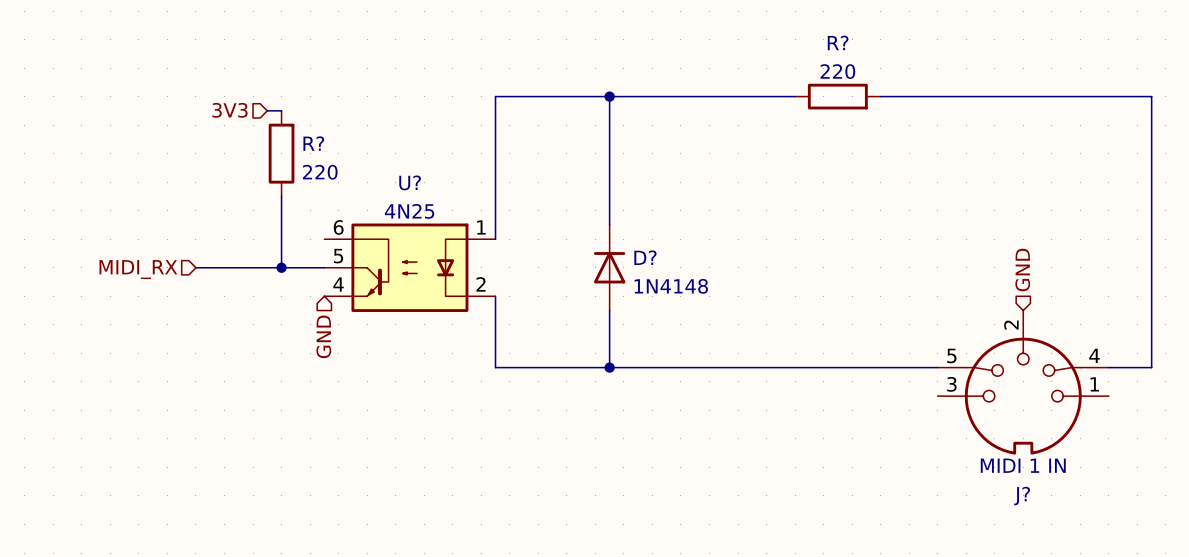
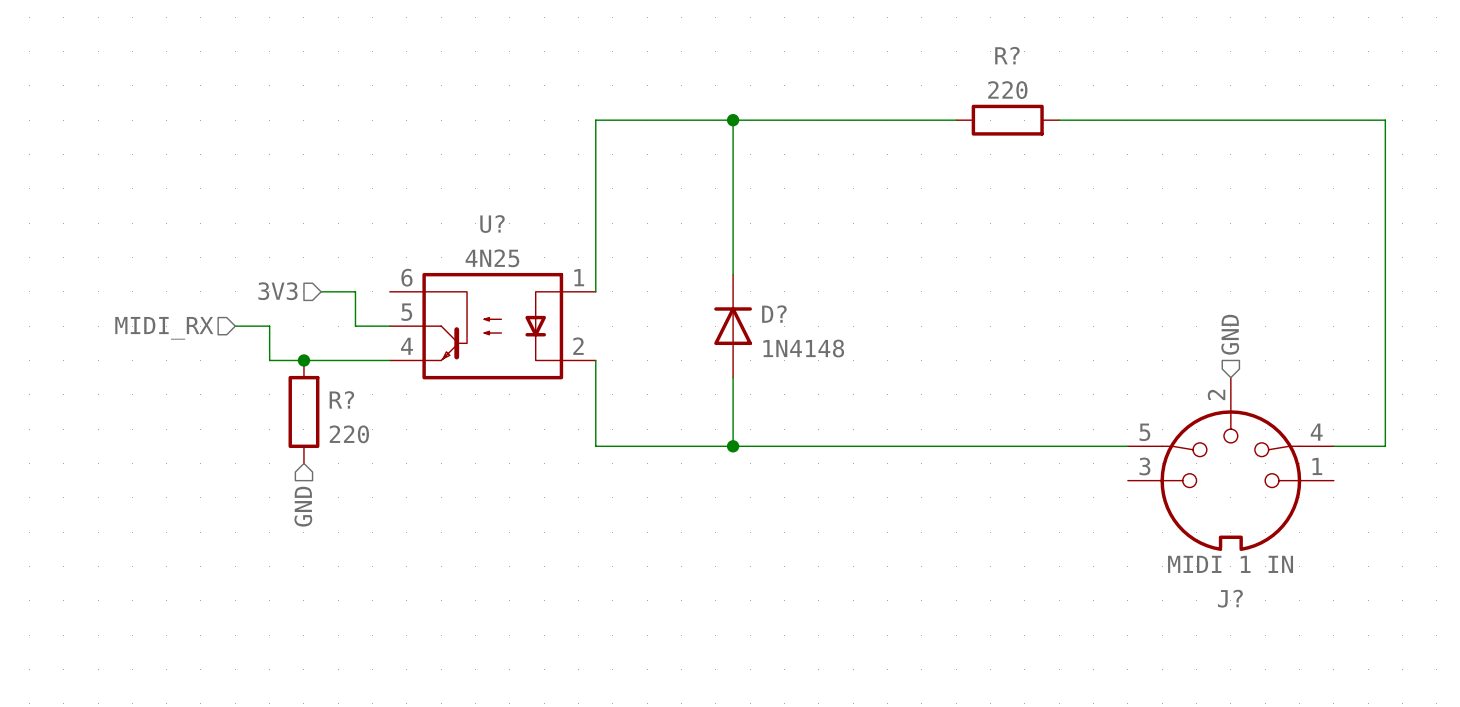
hierarchical label position: 3V3 (229, 110) -> 3V3 (277, 291)
wire: (267, 110) (281, 110) -> none
R? position: (281, 153) -> (303, 411)
wire: (281, 196) (281, 267) -> none
wire: none -> (321, 291) (355, 291) (355, 326)
wire: (224, 267) (295, 267) -> (269, 326) (269, 360) (389, 360)
junction position: (281, 267) -> (303, 360)
hierarchical label position: GND (323, 336) -> GND (303, 506)

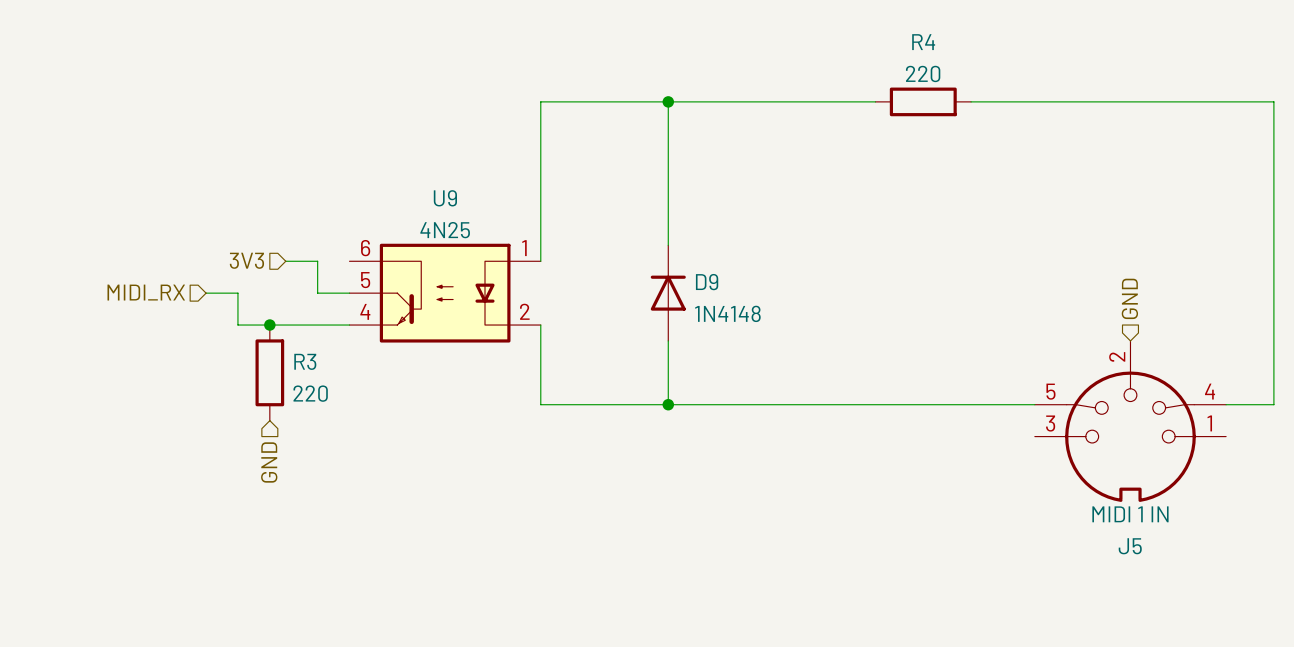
R? name: R? (1007, 55) -> R4 (923, 42)
U? name: U? (492, 224) -> U9 (445, 198)
D? name: D? (774, 314) -> D9 (707, 282)
R? name: R? (341, 399) -> R3 (305, 361)
J?: MIDI 1 IN (1230, 464) -> none
J5: none -> MIDI 1 IN (1130, 421)

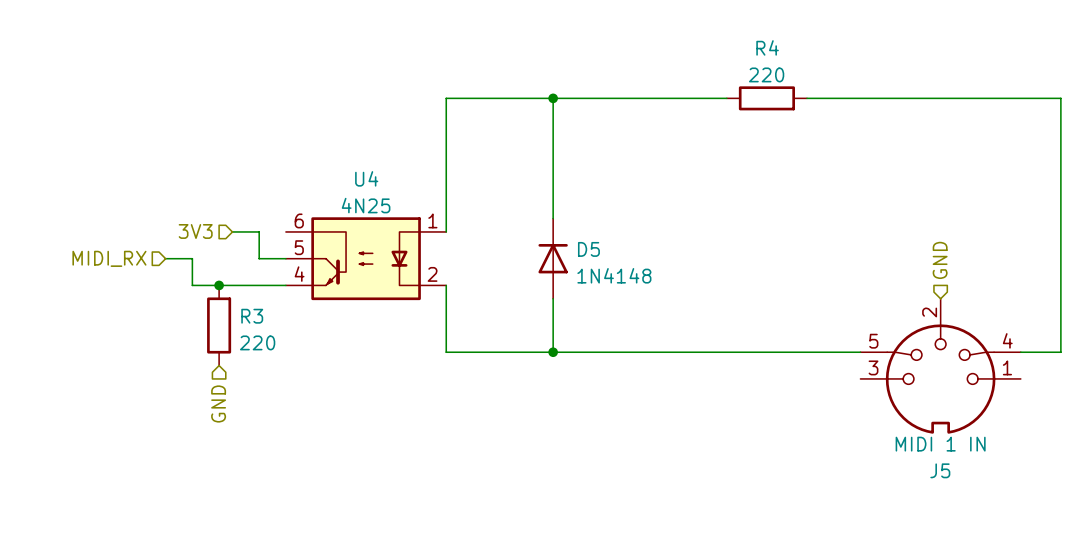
U9 name: U9 (445, 198) -> U4 (366, 178)
D9 name: D9 (707, 282) -> D5 (588, 249)

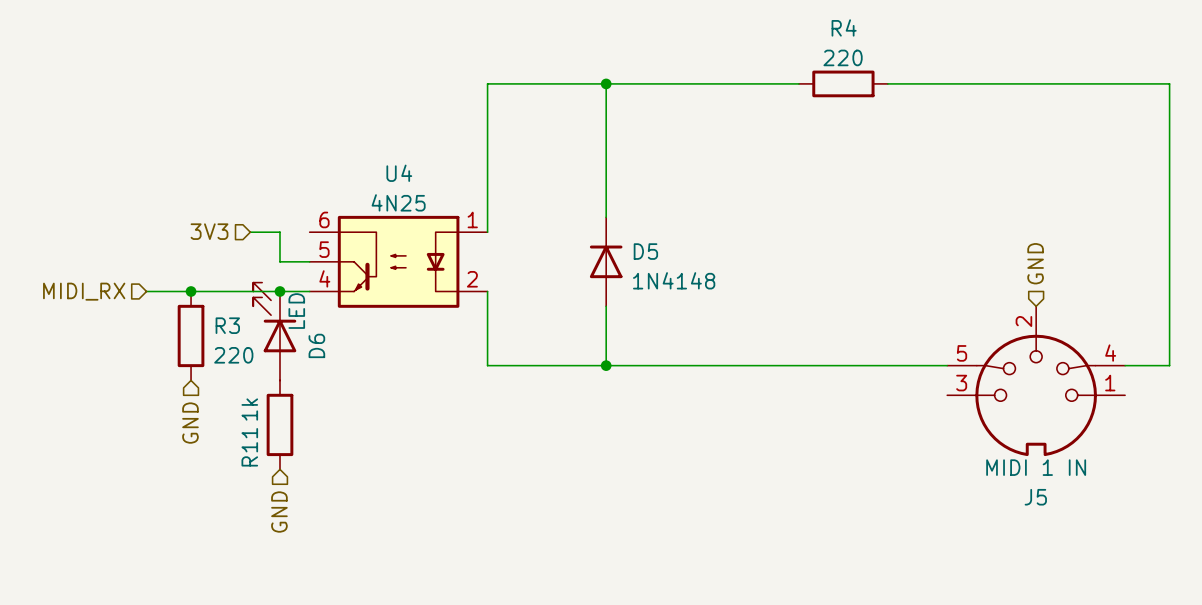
hierarchical label position: MIDI_RX (109, 258) -> MIDI_RX (84, 291)
wire: (165, 258) (192, 258) (192, 285) -> (146, 291) (205, 291)
junction: none -> (191, 291)
junction: (219, 285) -> none
junction: none -> (279, 291)
D6: none -> LED (274, 331)
R3 position: (219, 325) -> (191, 335)
hierarchical label position: GND (218, 403) -> GND (190, 423)
R11: none -> 1k (279, 424)
hierarchical label: none -> GND (279, 512)

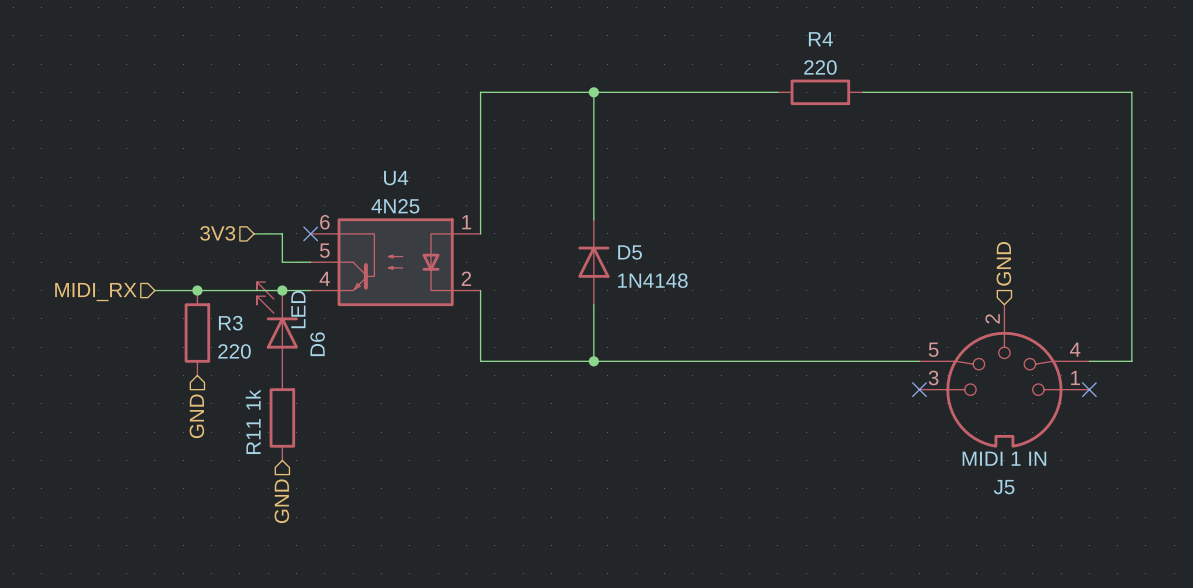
no-connect mark: none -> (310, 233)
no-connect mark: none -> (919, 389)
no-connect mark: none -> (1089, 389)

